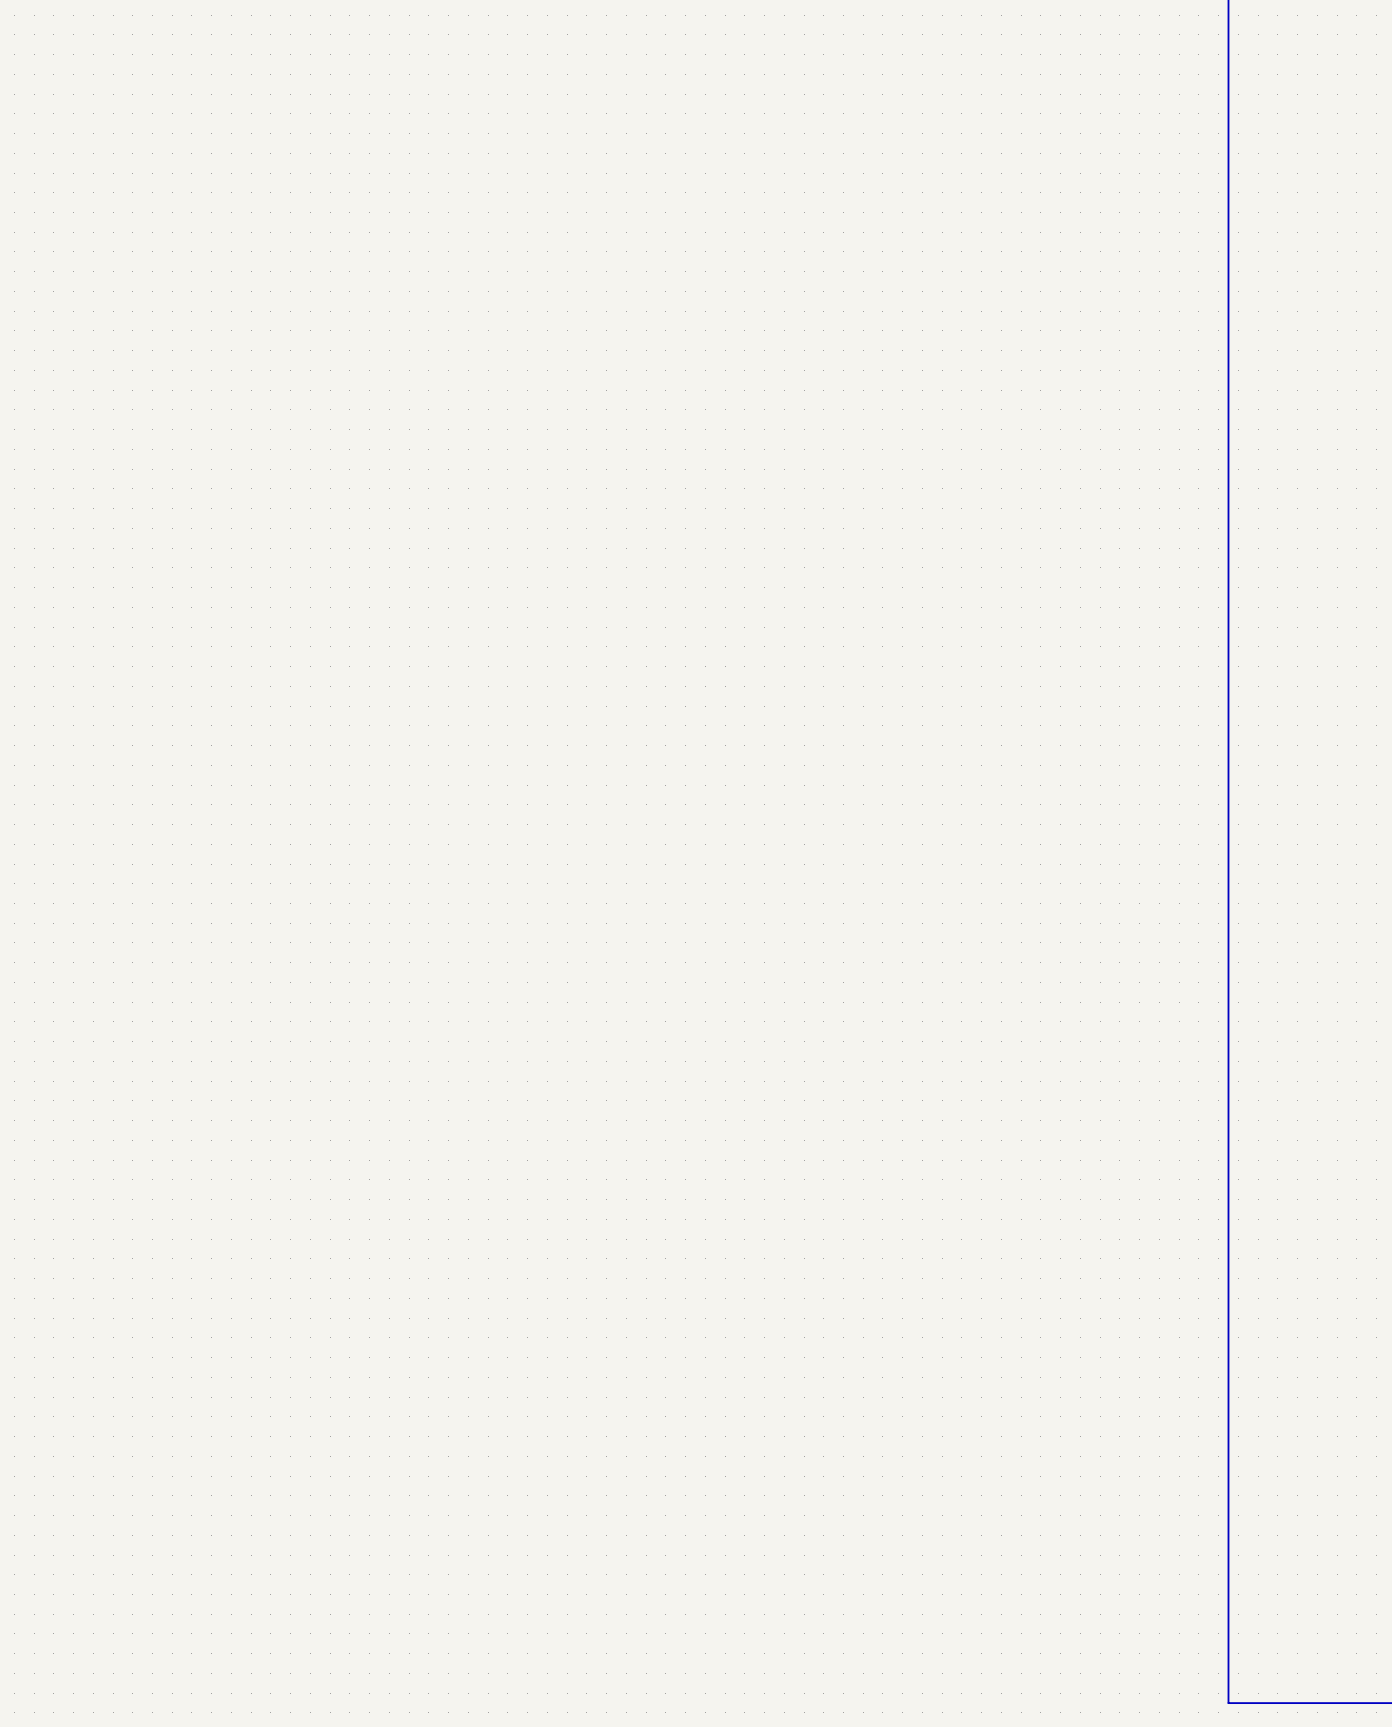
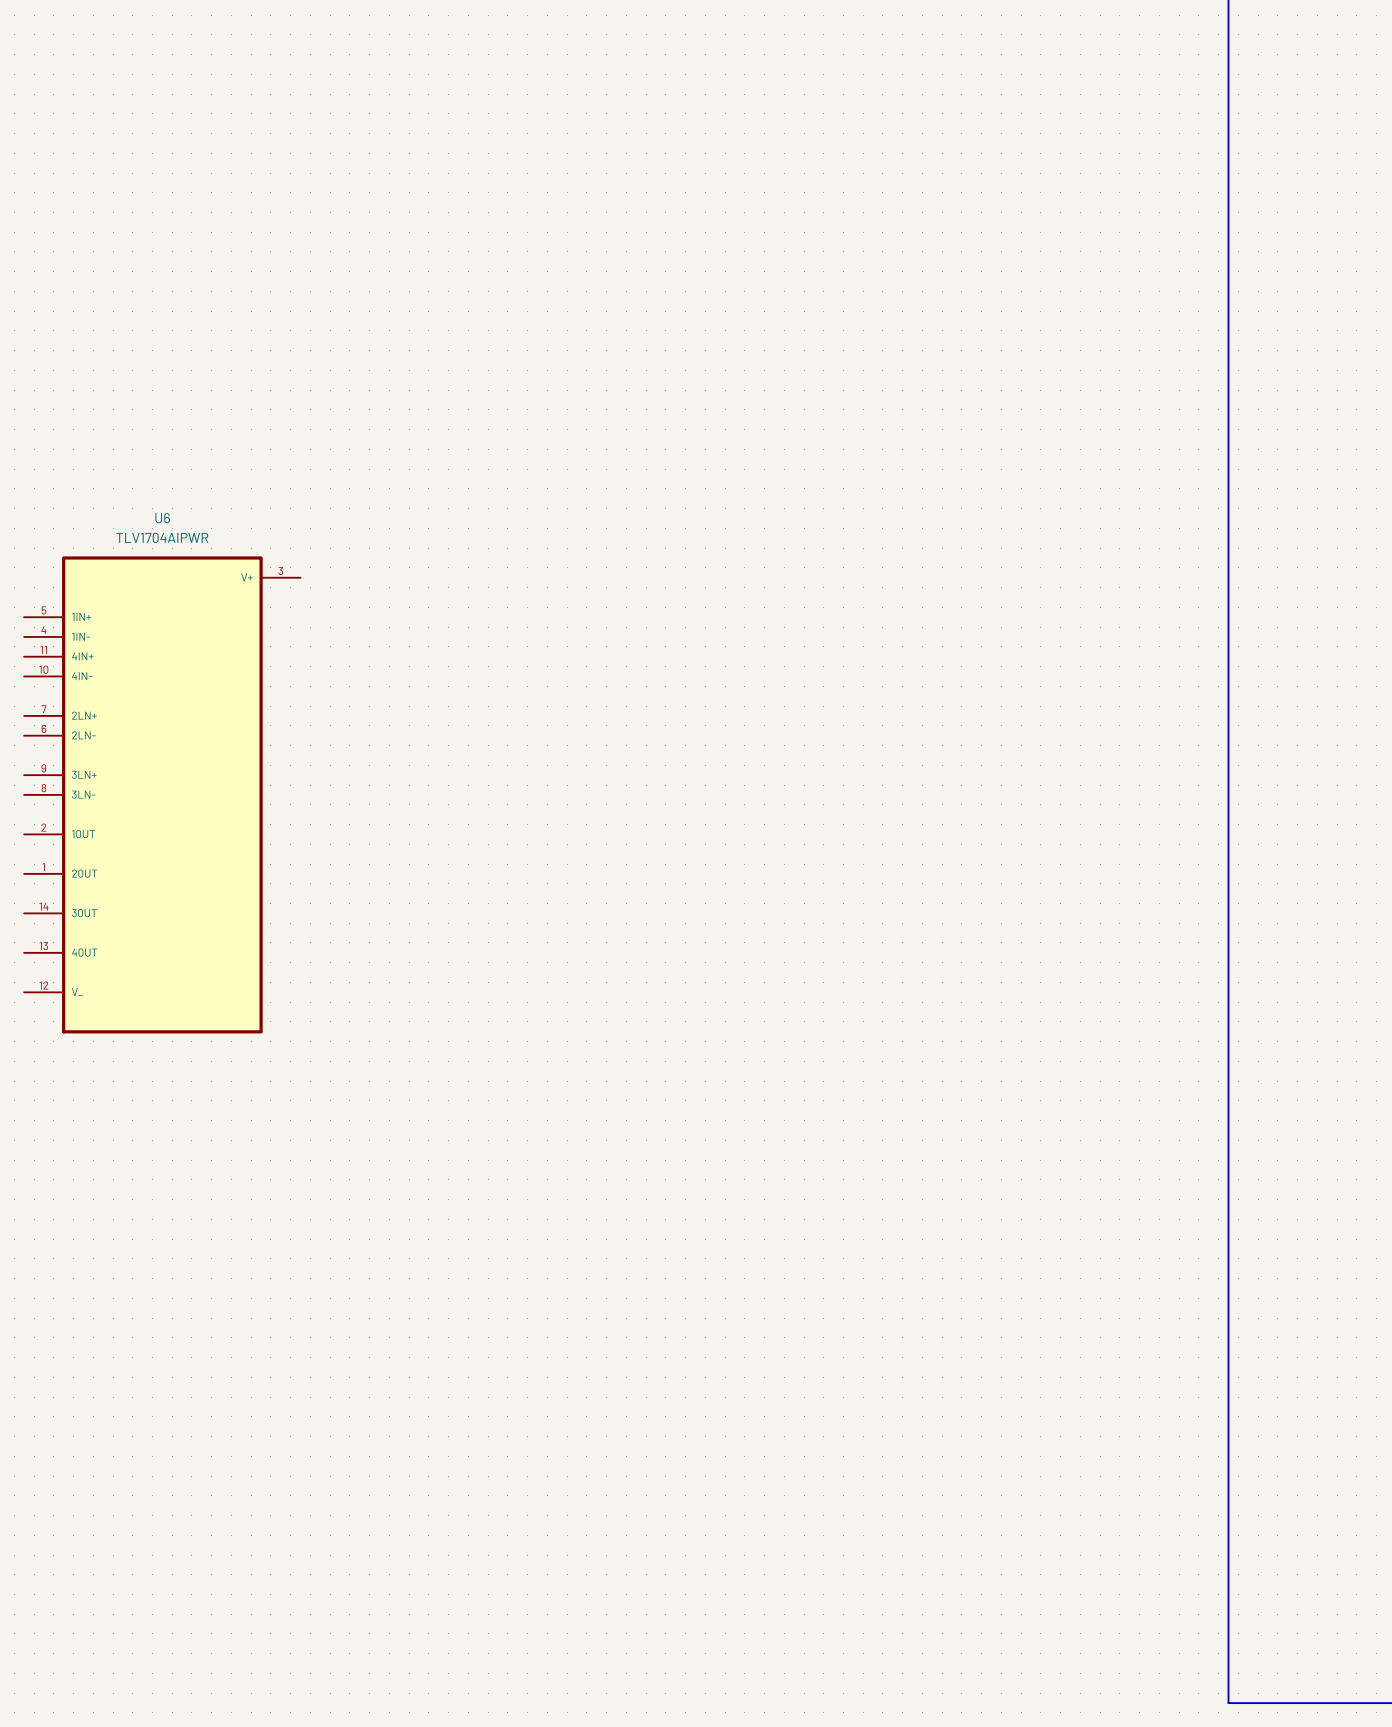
U6: none -> TLV1704AIPWR (162, 794)

